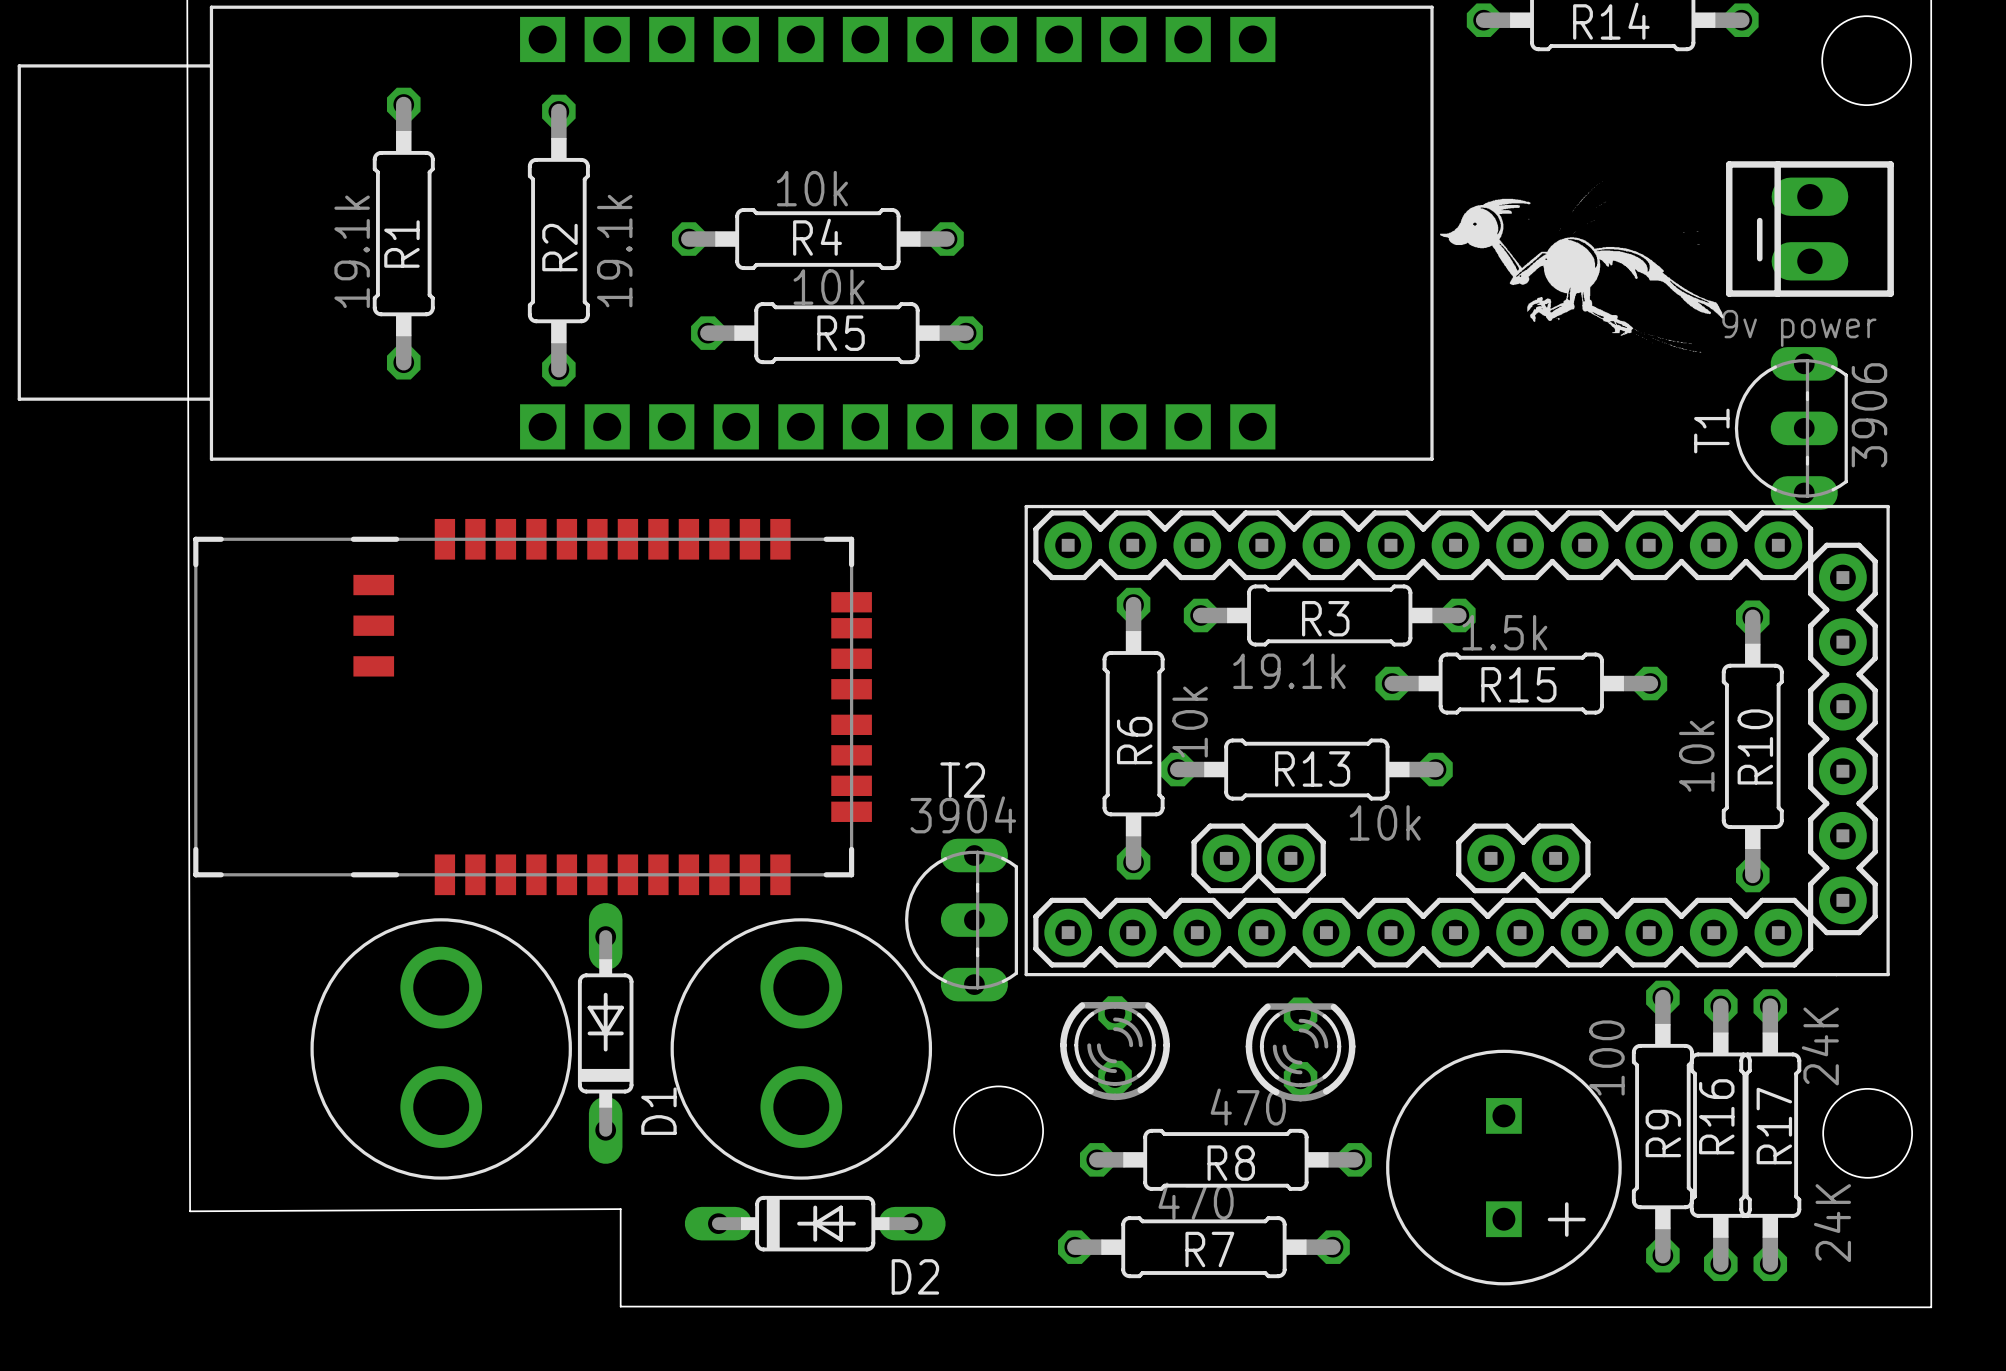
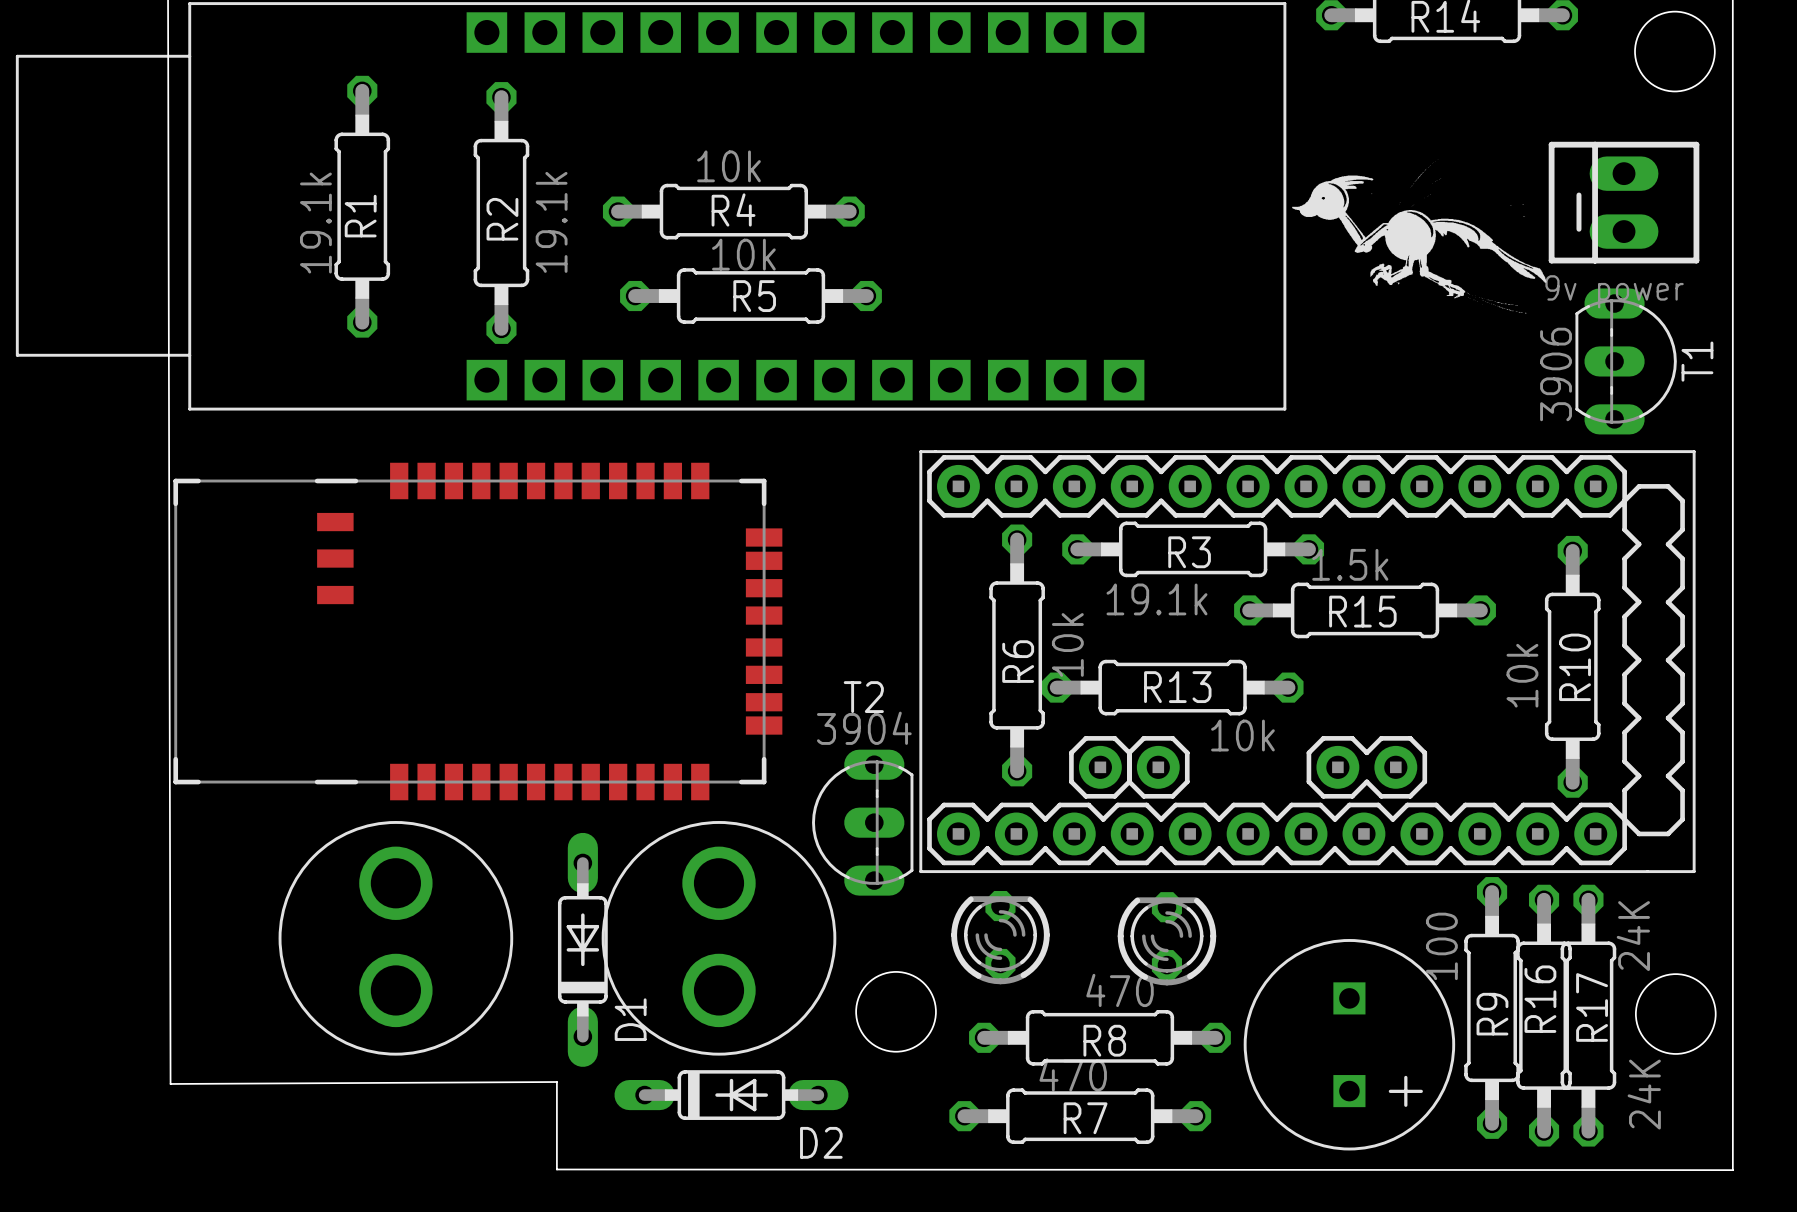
T1 rotation: 0° (1791, 428) -> 180° (1626, 361)
part footprint: [1024, 504, 1890, 977] -> [919, 450, 1696, 874]
D1 position: (605, 1033) -> (582, 949)

